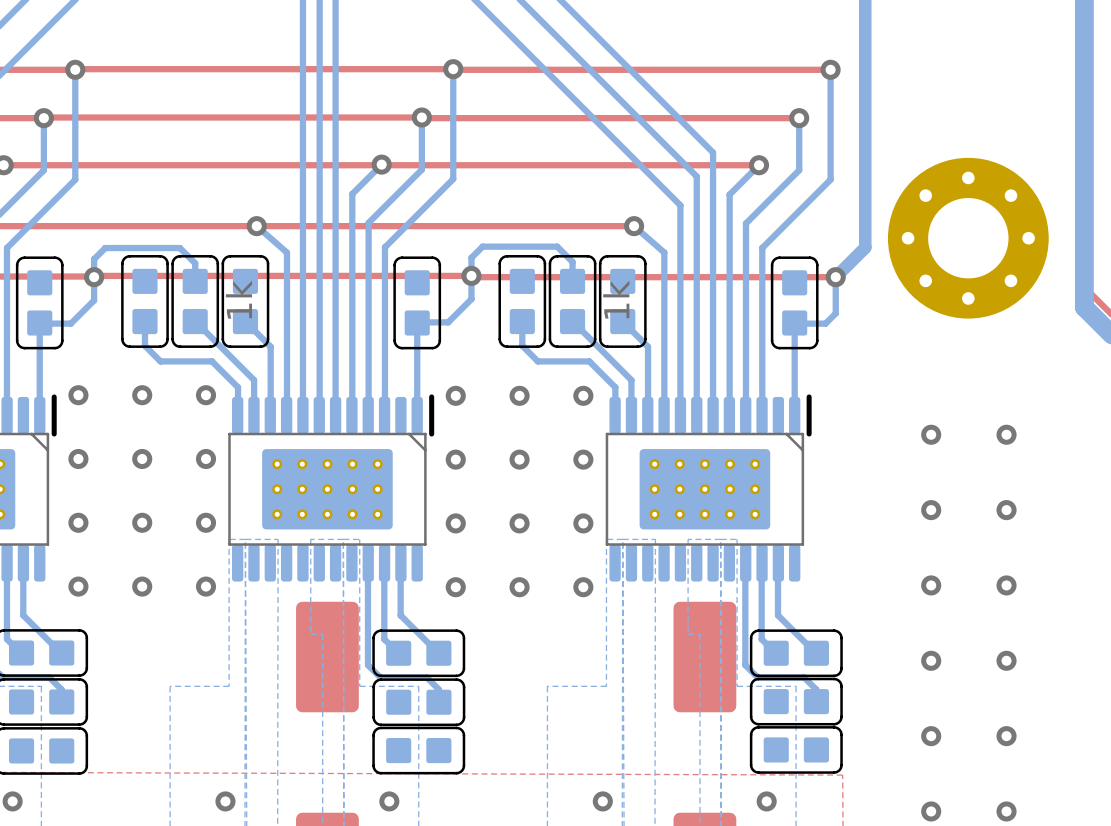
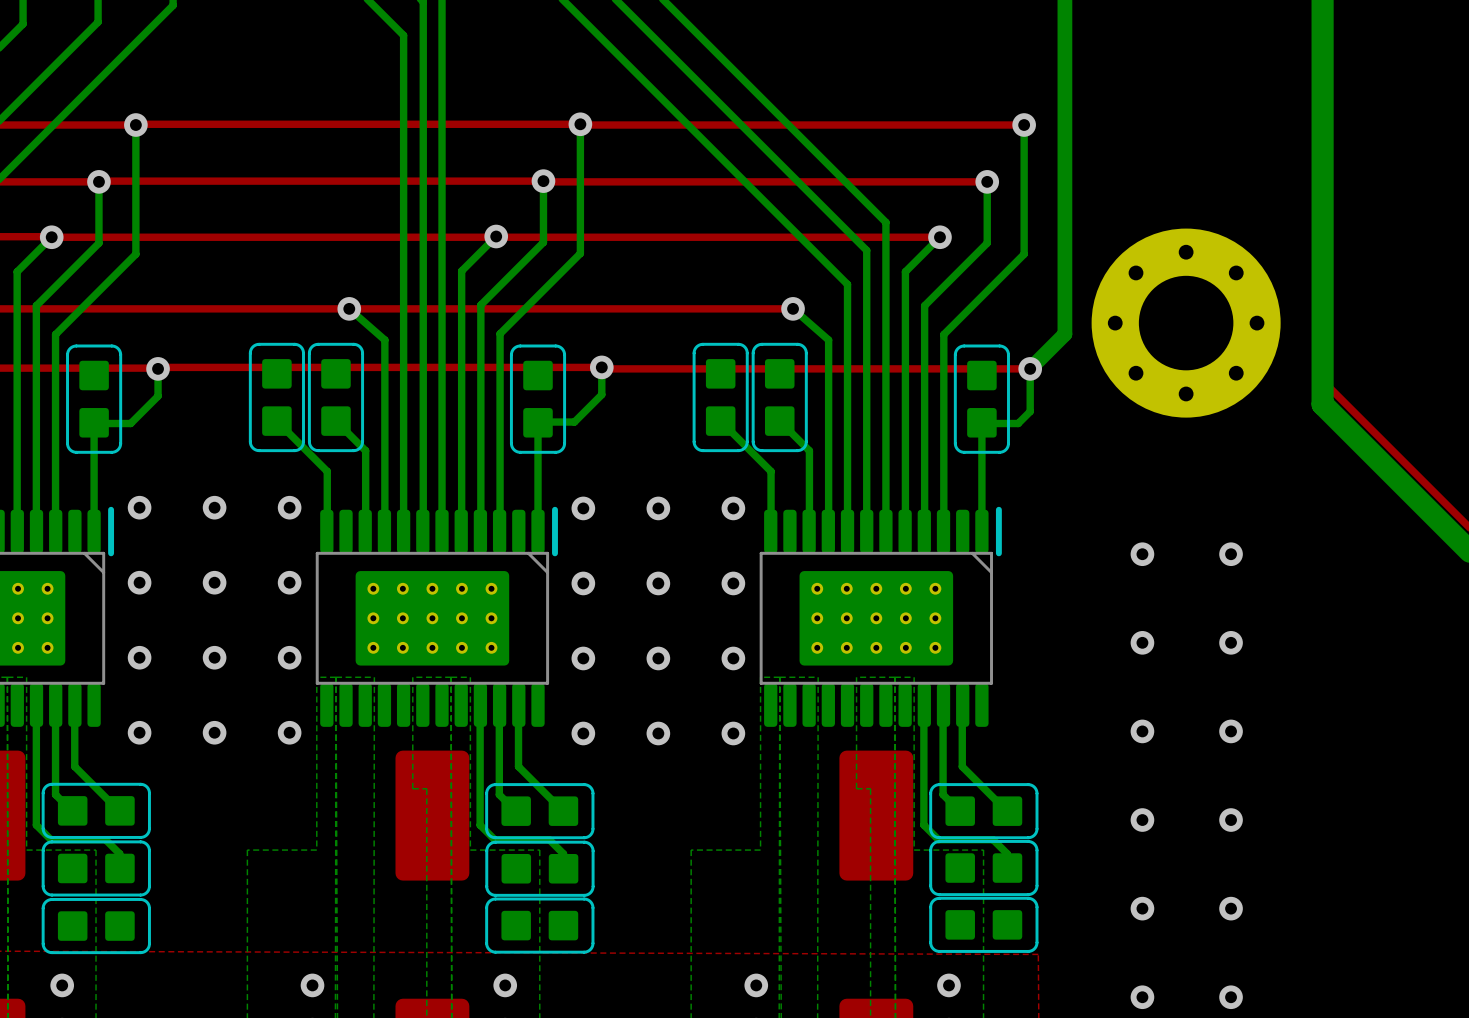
bottom track: (471, 275) (471, 257) (482, 246) (557, 246) (572, 261) (572, 281) -> none
bottom track: (94, 277) (94, 259) (105, 248) (179, 248) (195, 263) (195, 282) -> none
part value: 1k (238, 299) -> none
part value: 1k (616, 299) -> none
part: (144, 301) -> none
part: (522, 301) -> none
bottom track: (144, 321) (144, 345) (160, 361) (212, 361) (238, 387) -> none
bottom track: (195, 321) (254, 380) (254, 415) -> (276, 421) (327, 471) (327, 498)
bottom track: (522, 321) (522, 345) (537, 361) (589, 361) (615, 387) -> none
bottom track: (572, 321) (631, 380) (631, 415) -> (720, 421) (771, 471) (771, 498)

